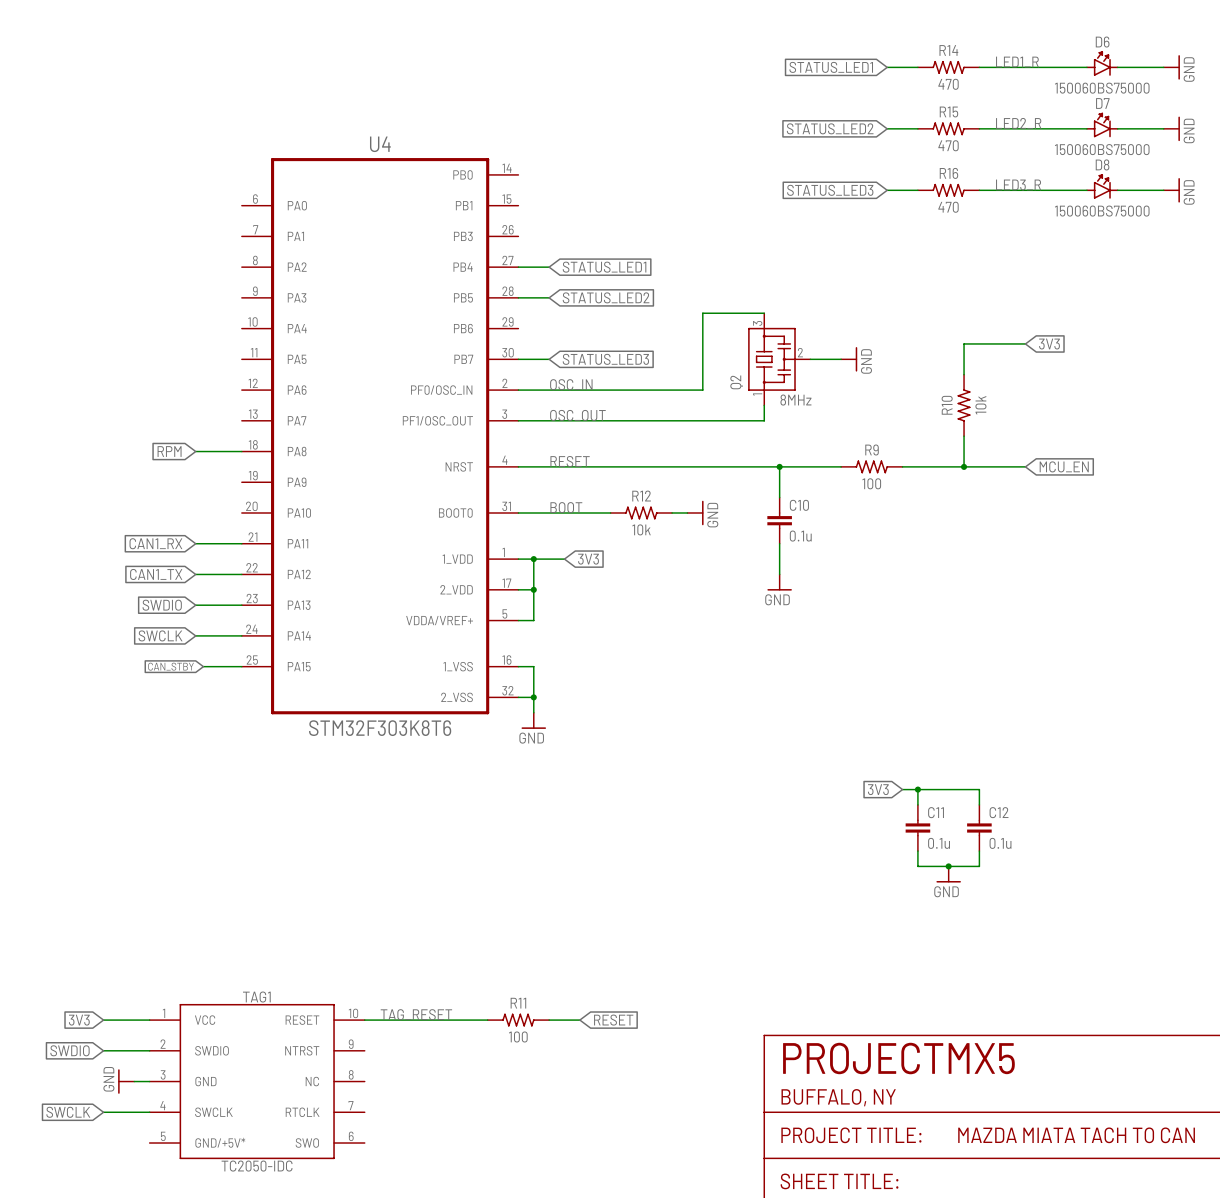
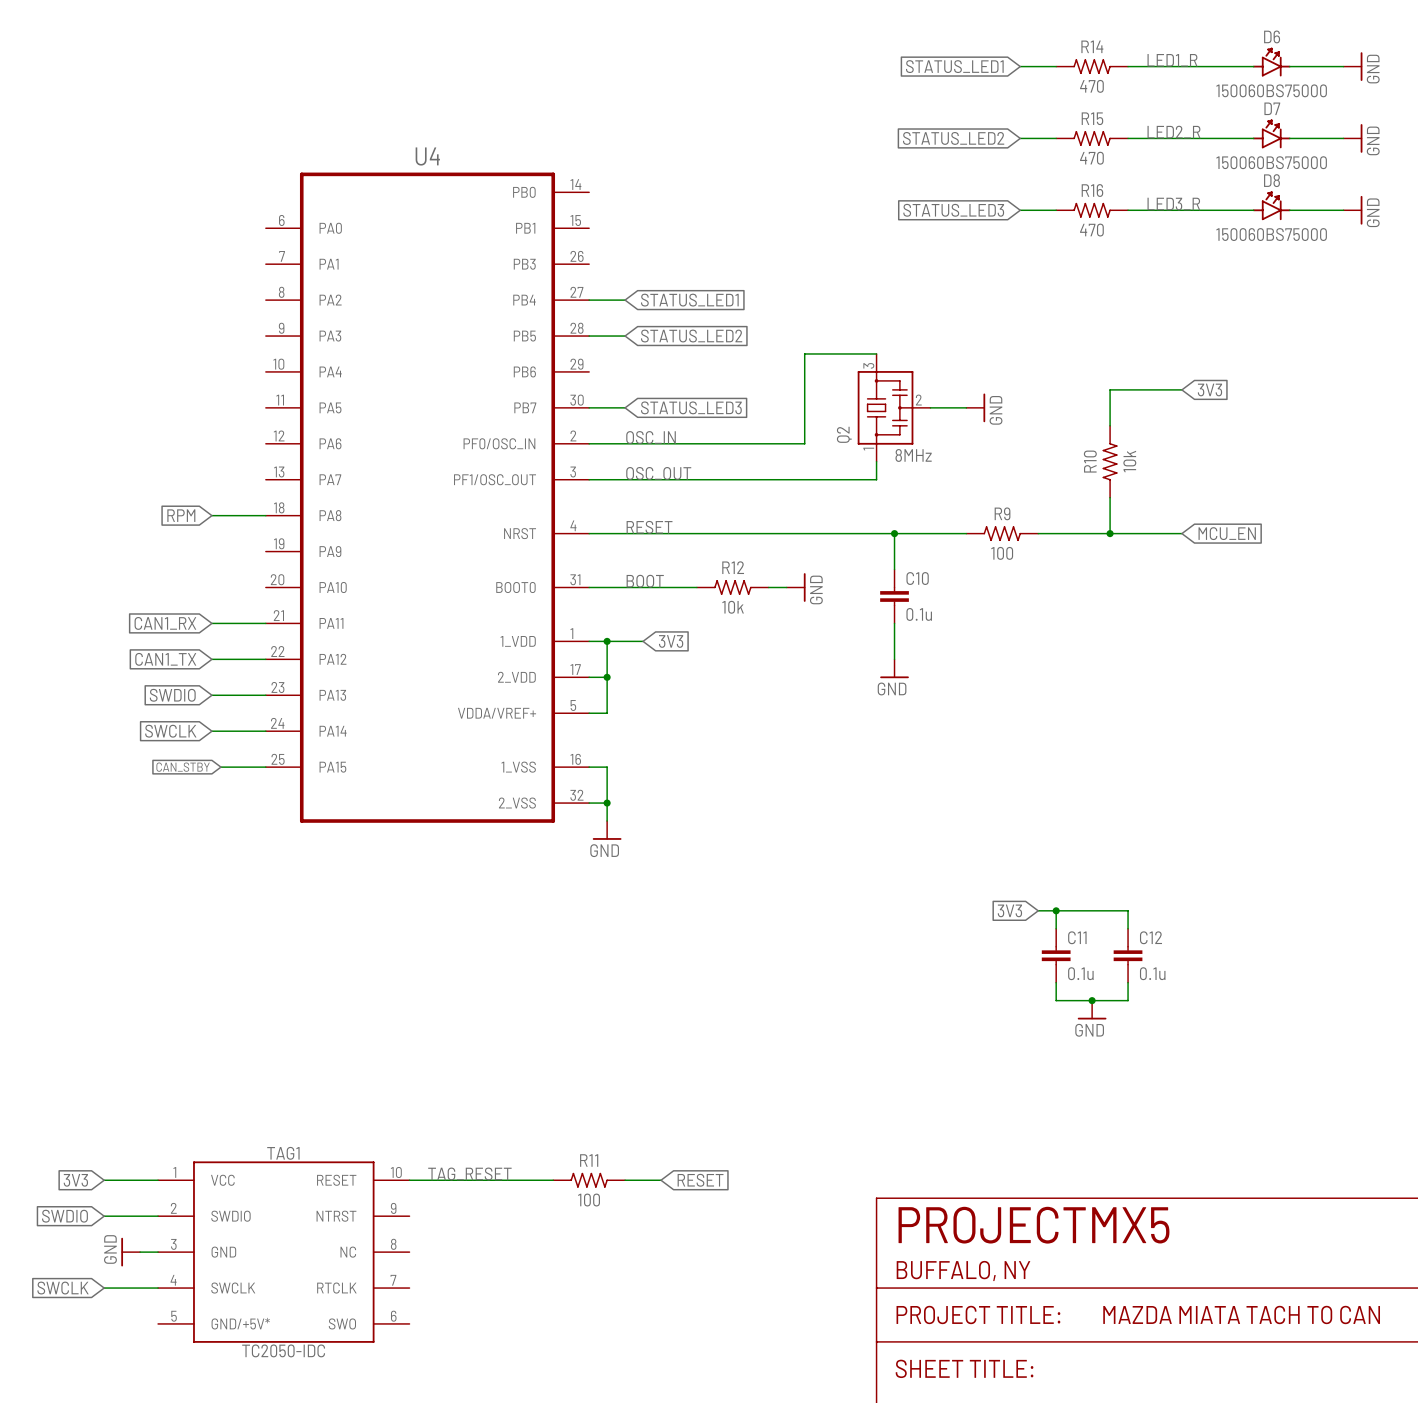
U4 text: STM32F303K8T6 (380, 728) -> none

